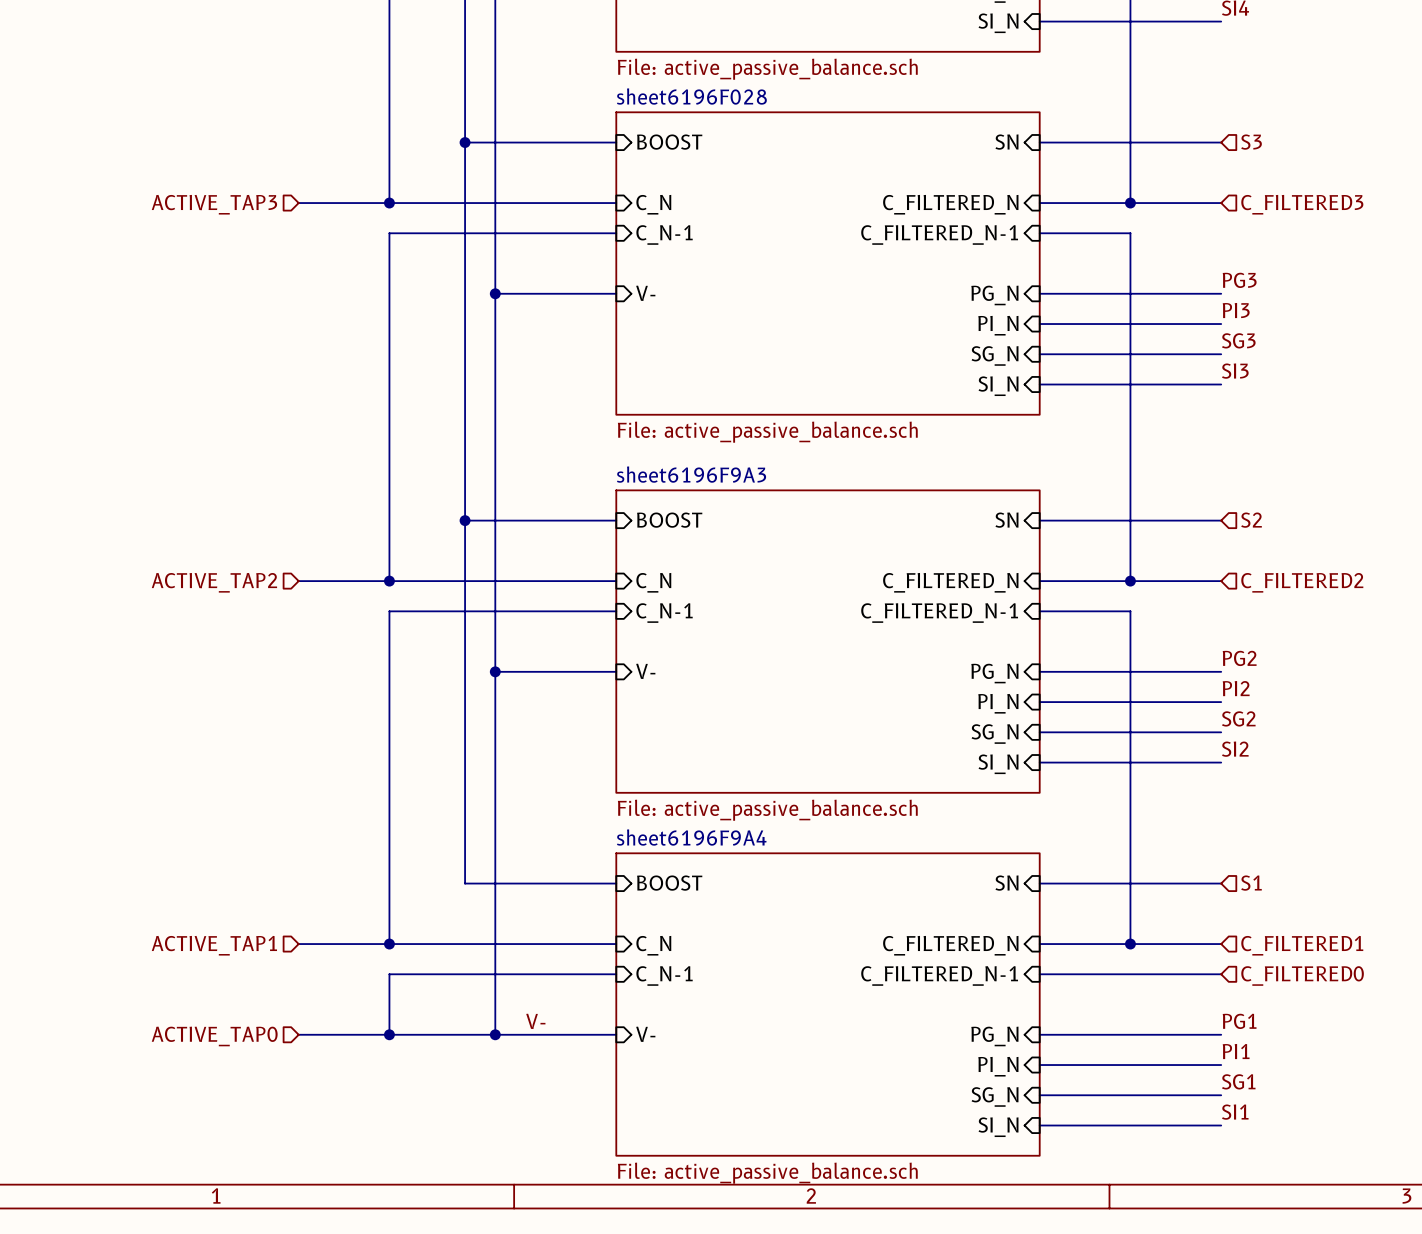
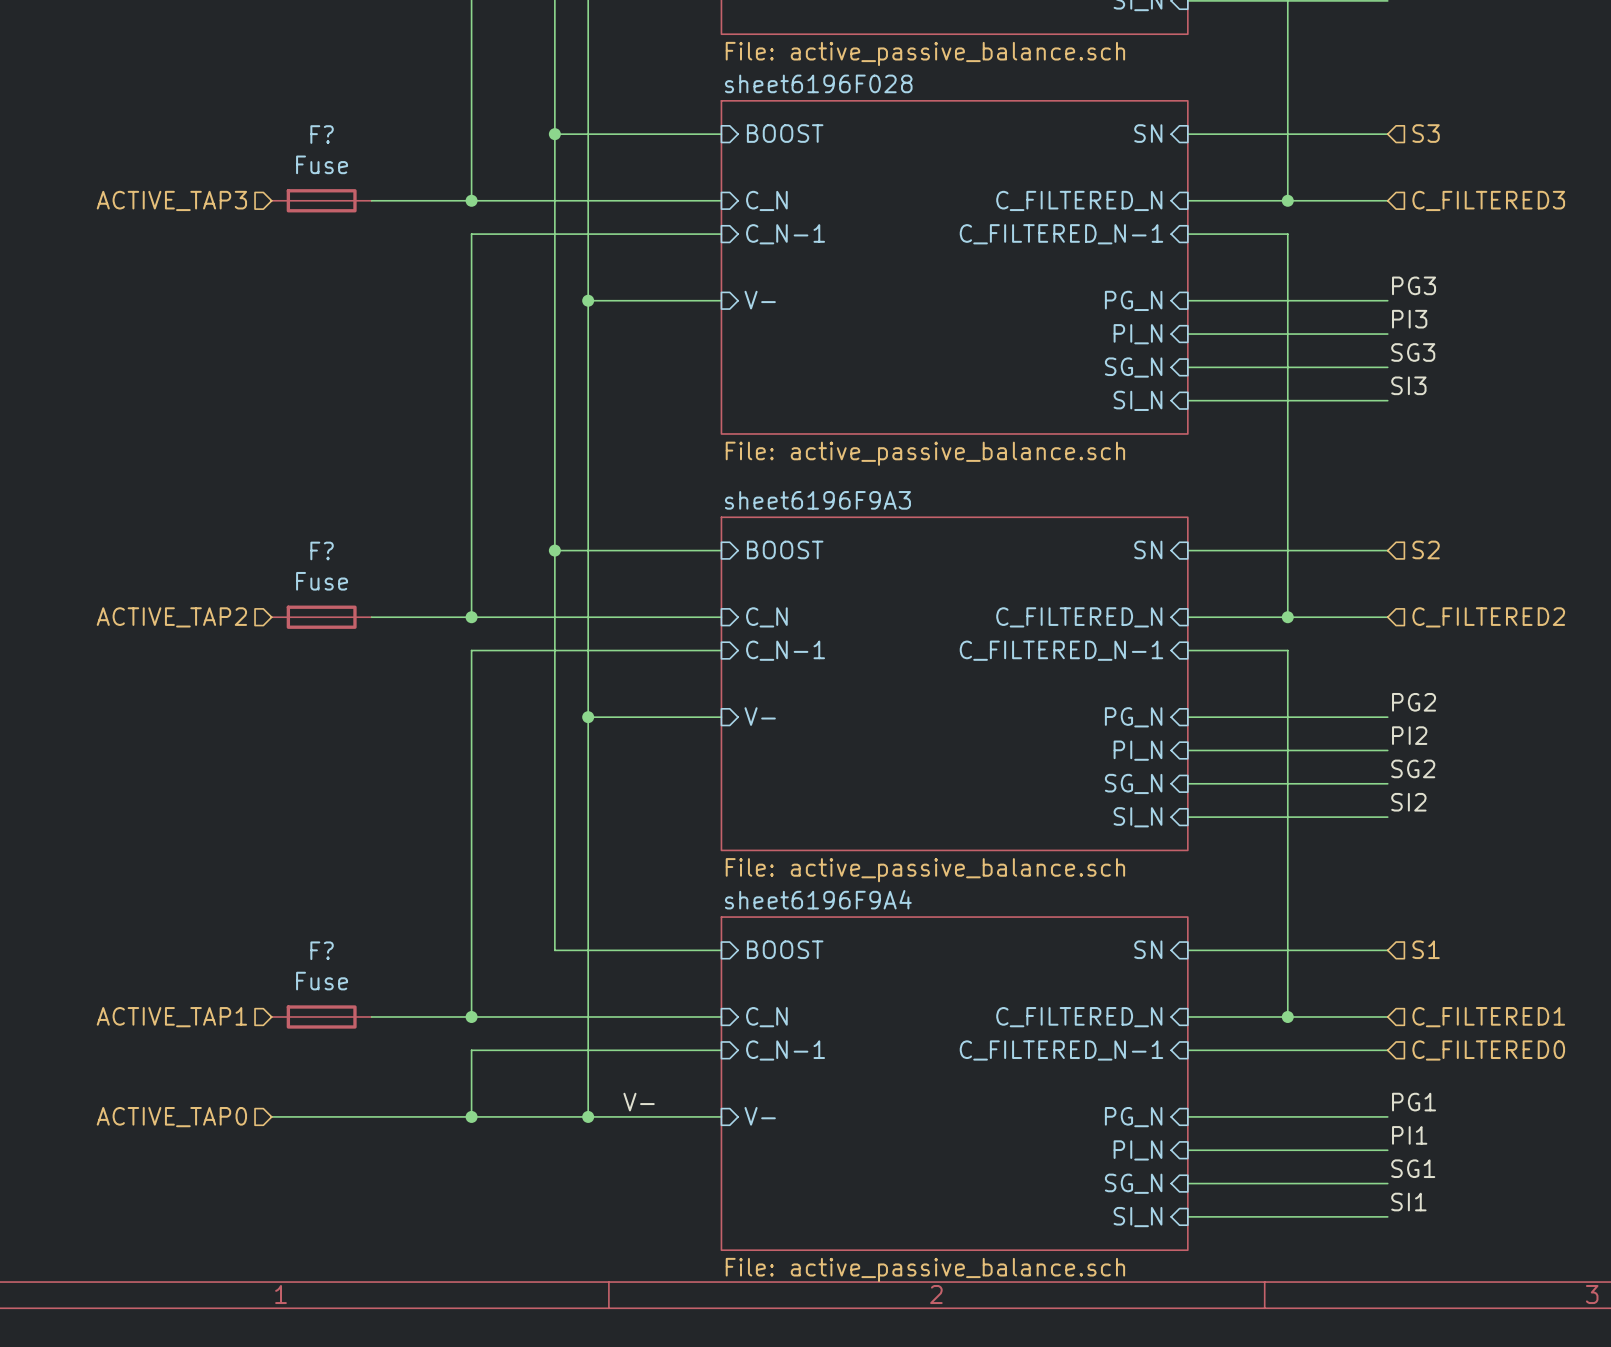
F?: none -> Fuse (321, 200)
hierarchical label position: ACTIVE_TAP3 (214, 204) -> ACTIVE_TAP3 (171, 200)
F?: none -> Fuse (321, 617)
hierarchical label position: ACTIVE_TAP2 (214, 582) -> ACTIVE_TAP2 (171, 617)
F?: none -> Fuse (321, 1016)
hierarchical label position: ACTIVE_TAP1 (214, 945) -> ACTIVE_TAP1 (171, 1017)
wire: none -> (271, 1116) (371, 1116)
hierarchical label position: ACTIVE_TAP0 (214, 1036) -> ACTIVE_TAP0 (171, 1117)

